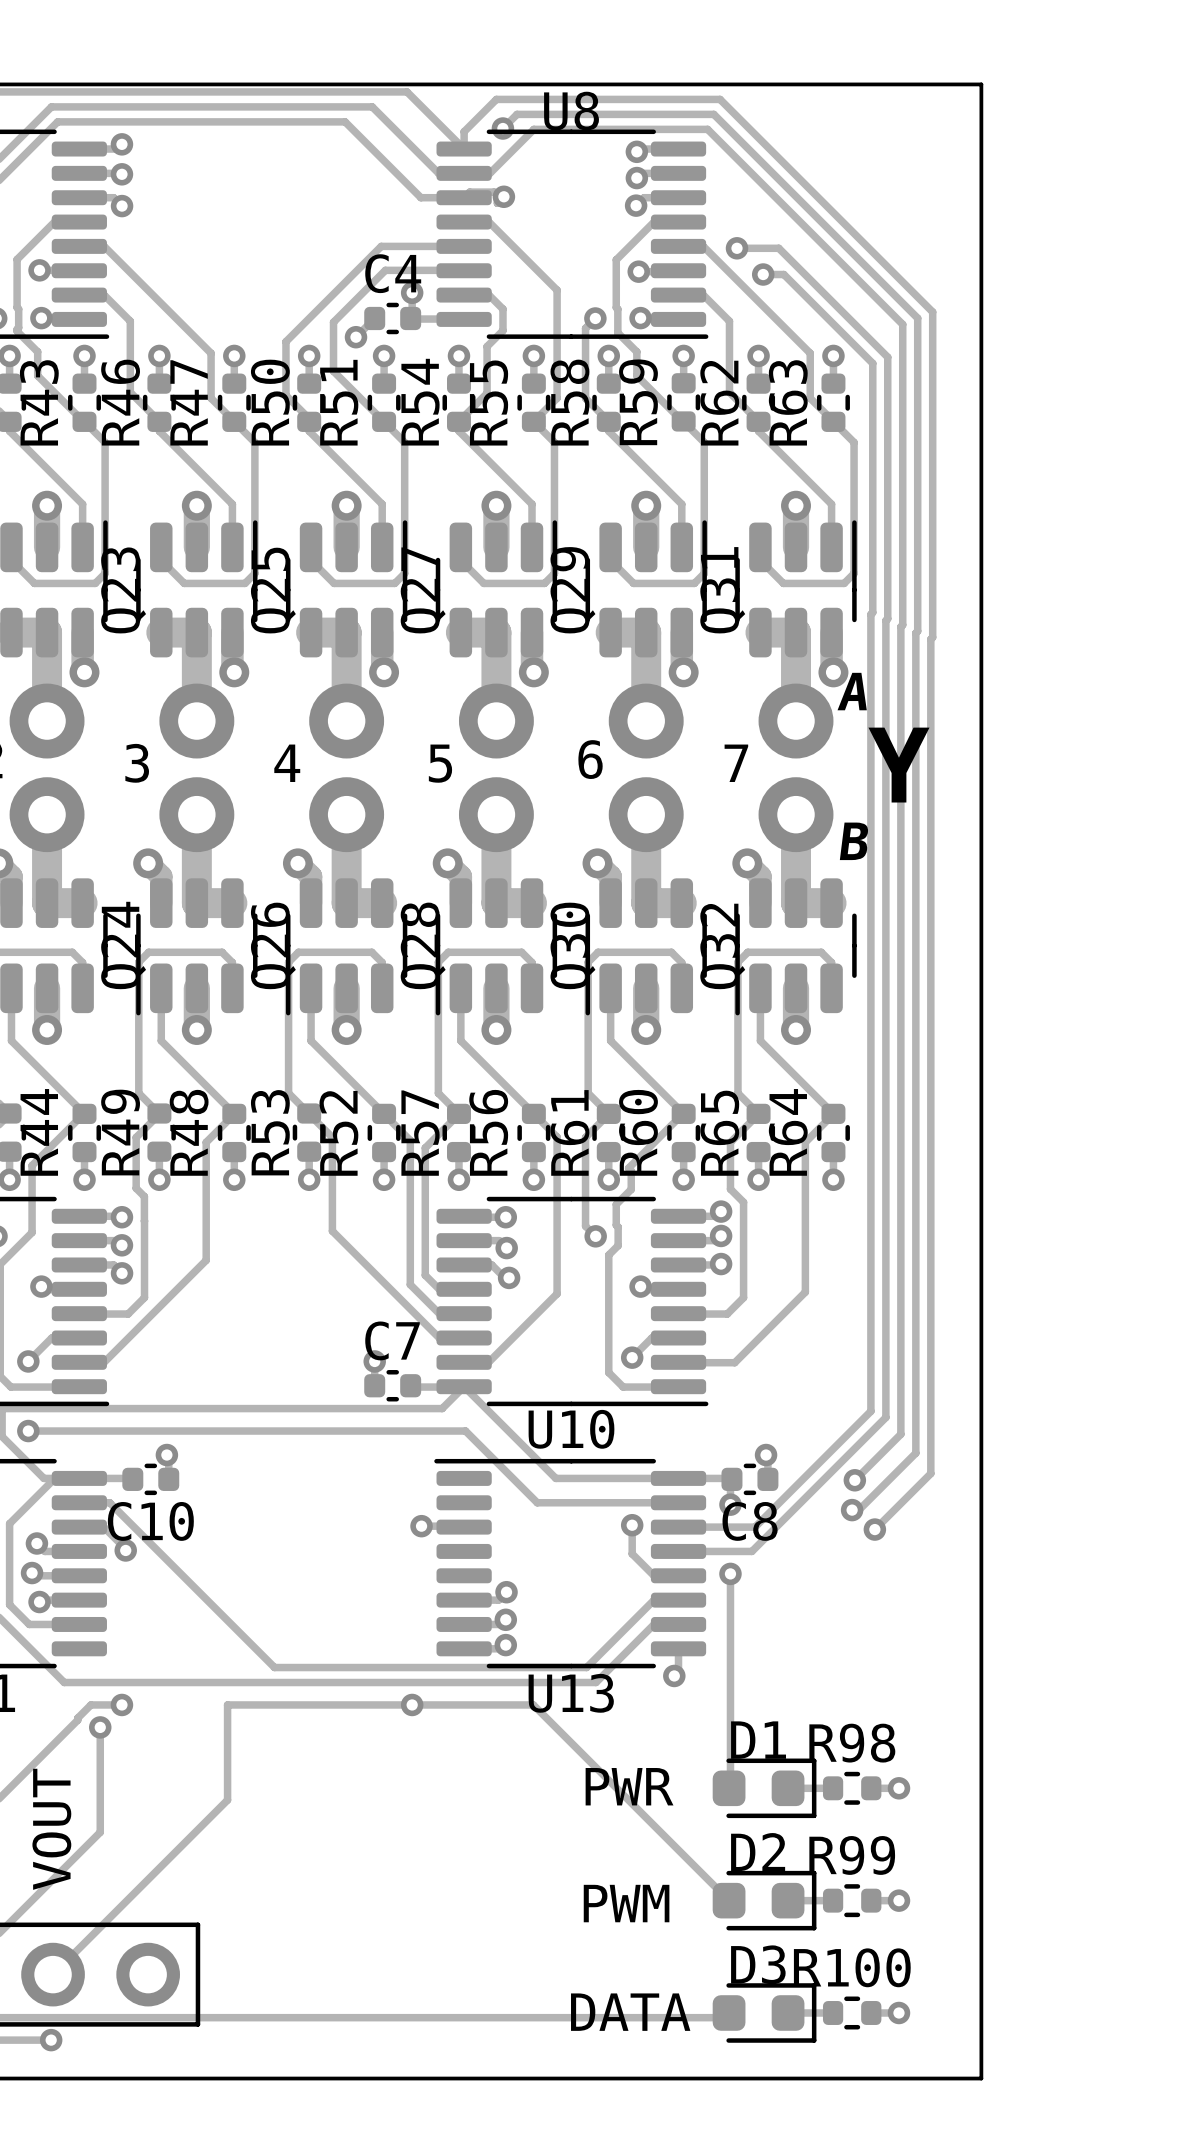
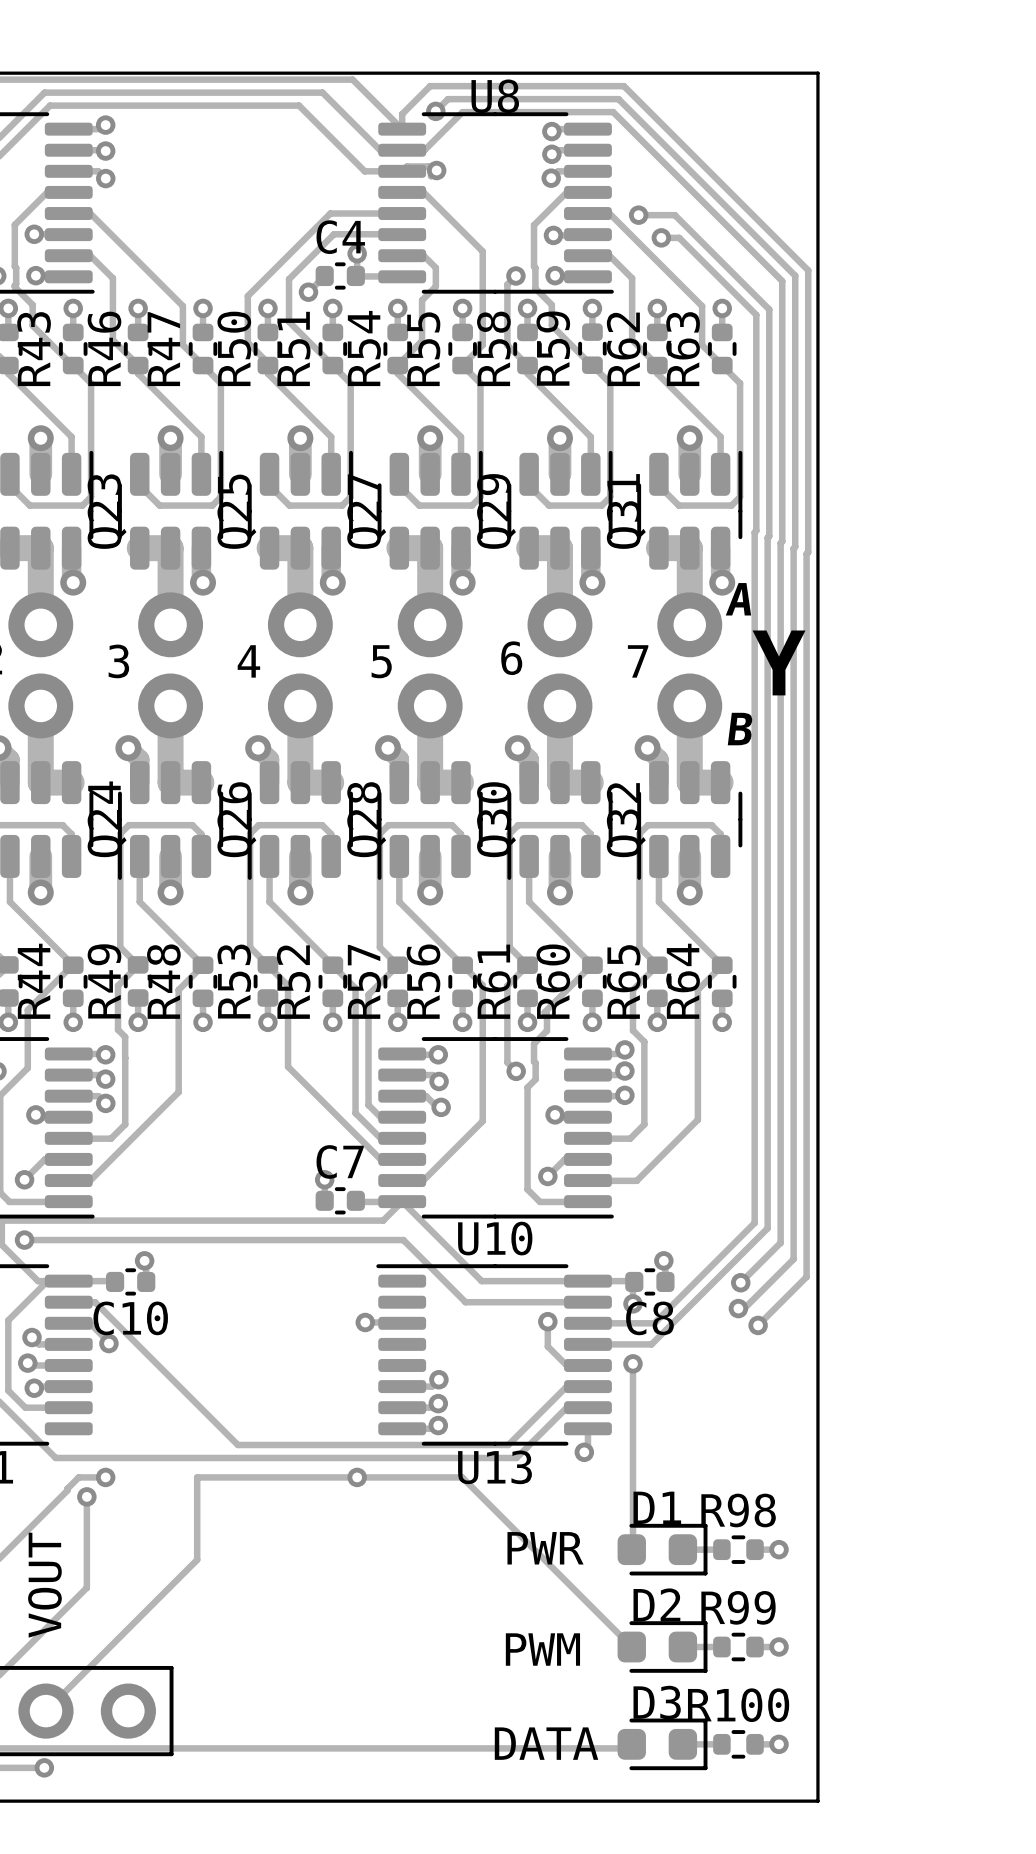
board edge: (943, 84) (981, 84) (981, 2078) (943, 2078) -> (817, 73) (817, 1801)

